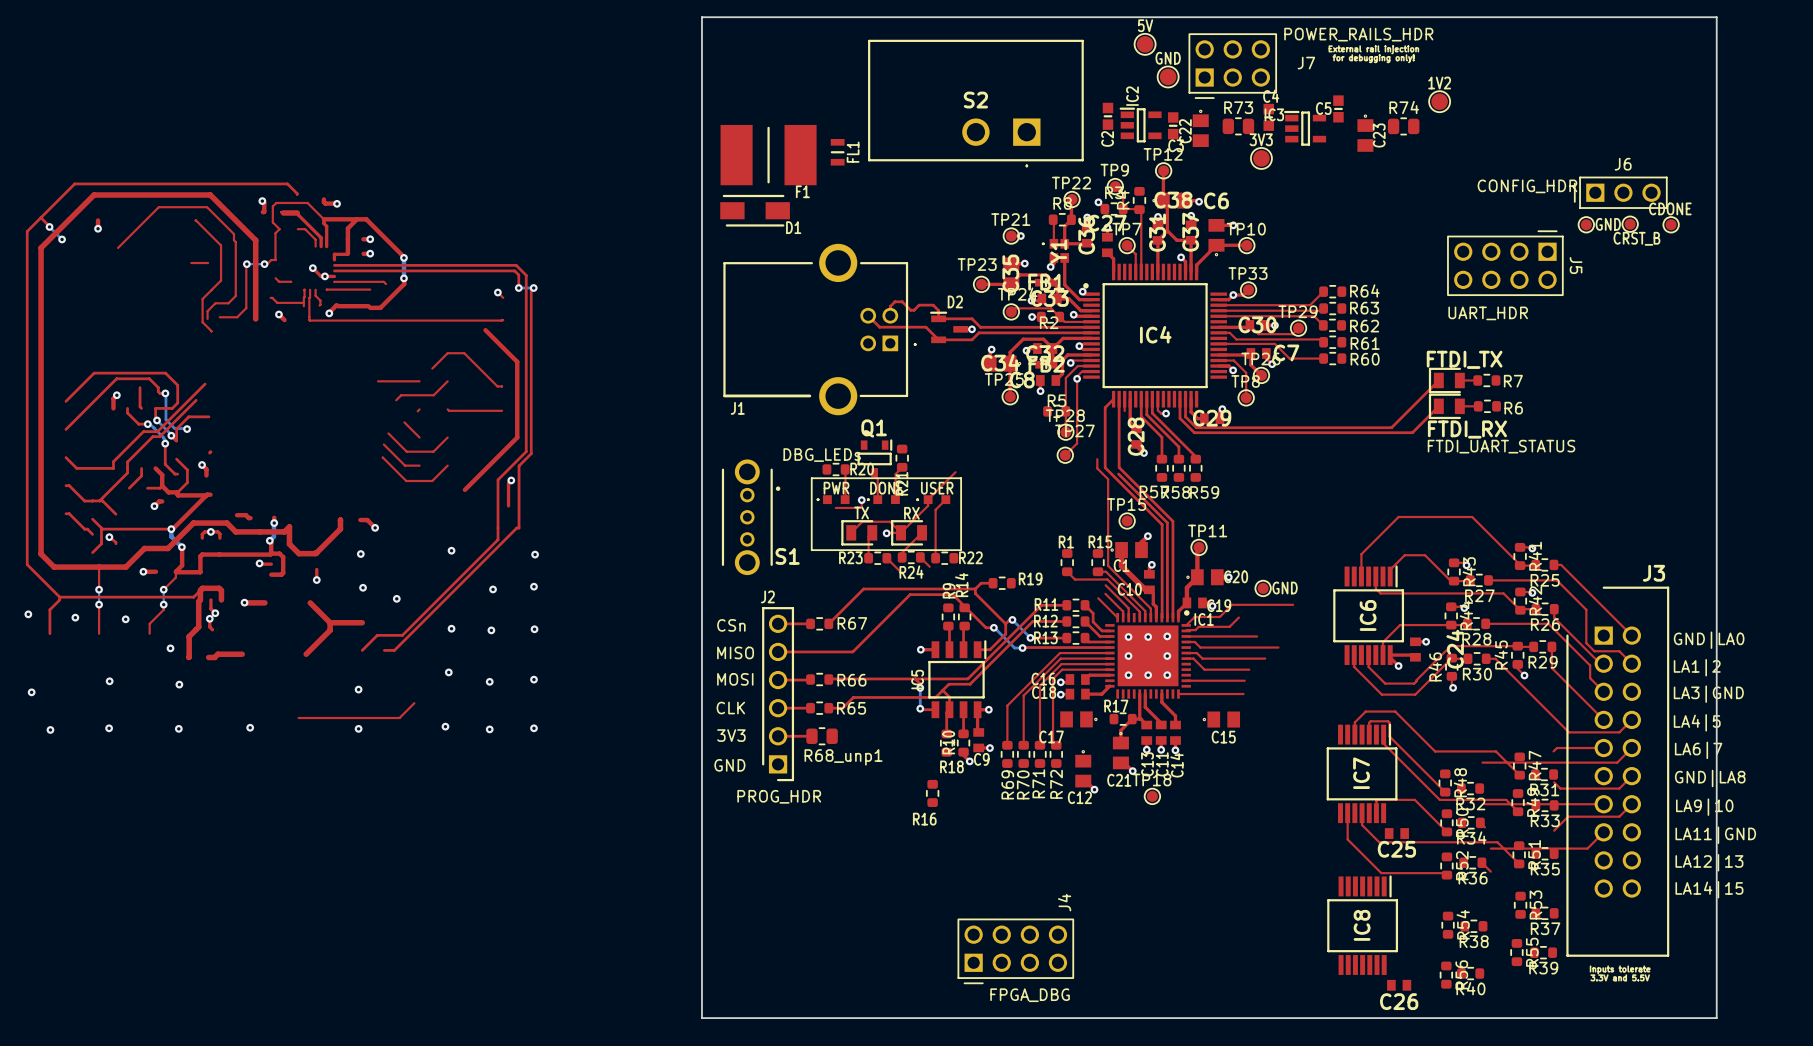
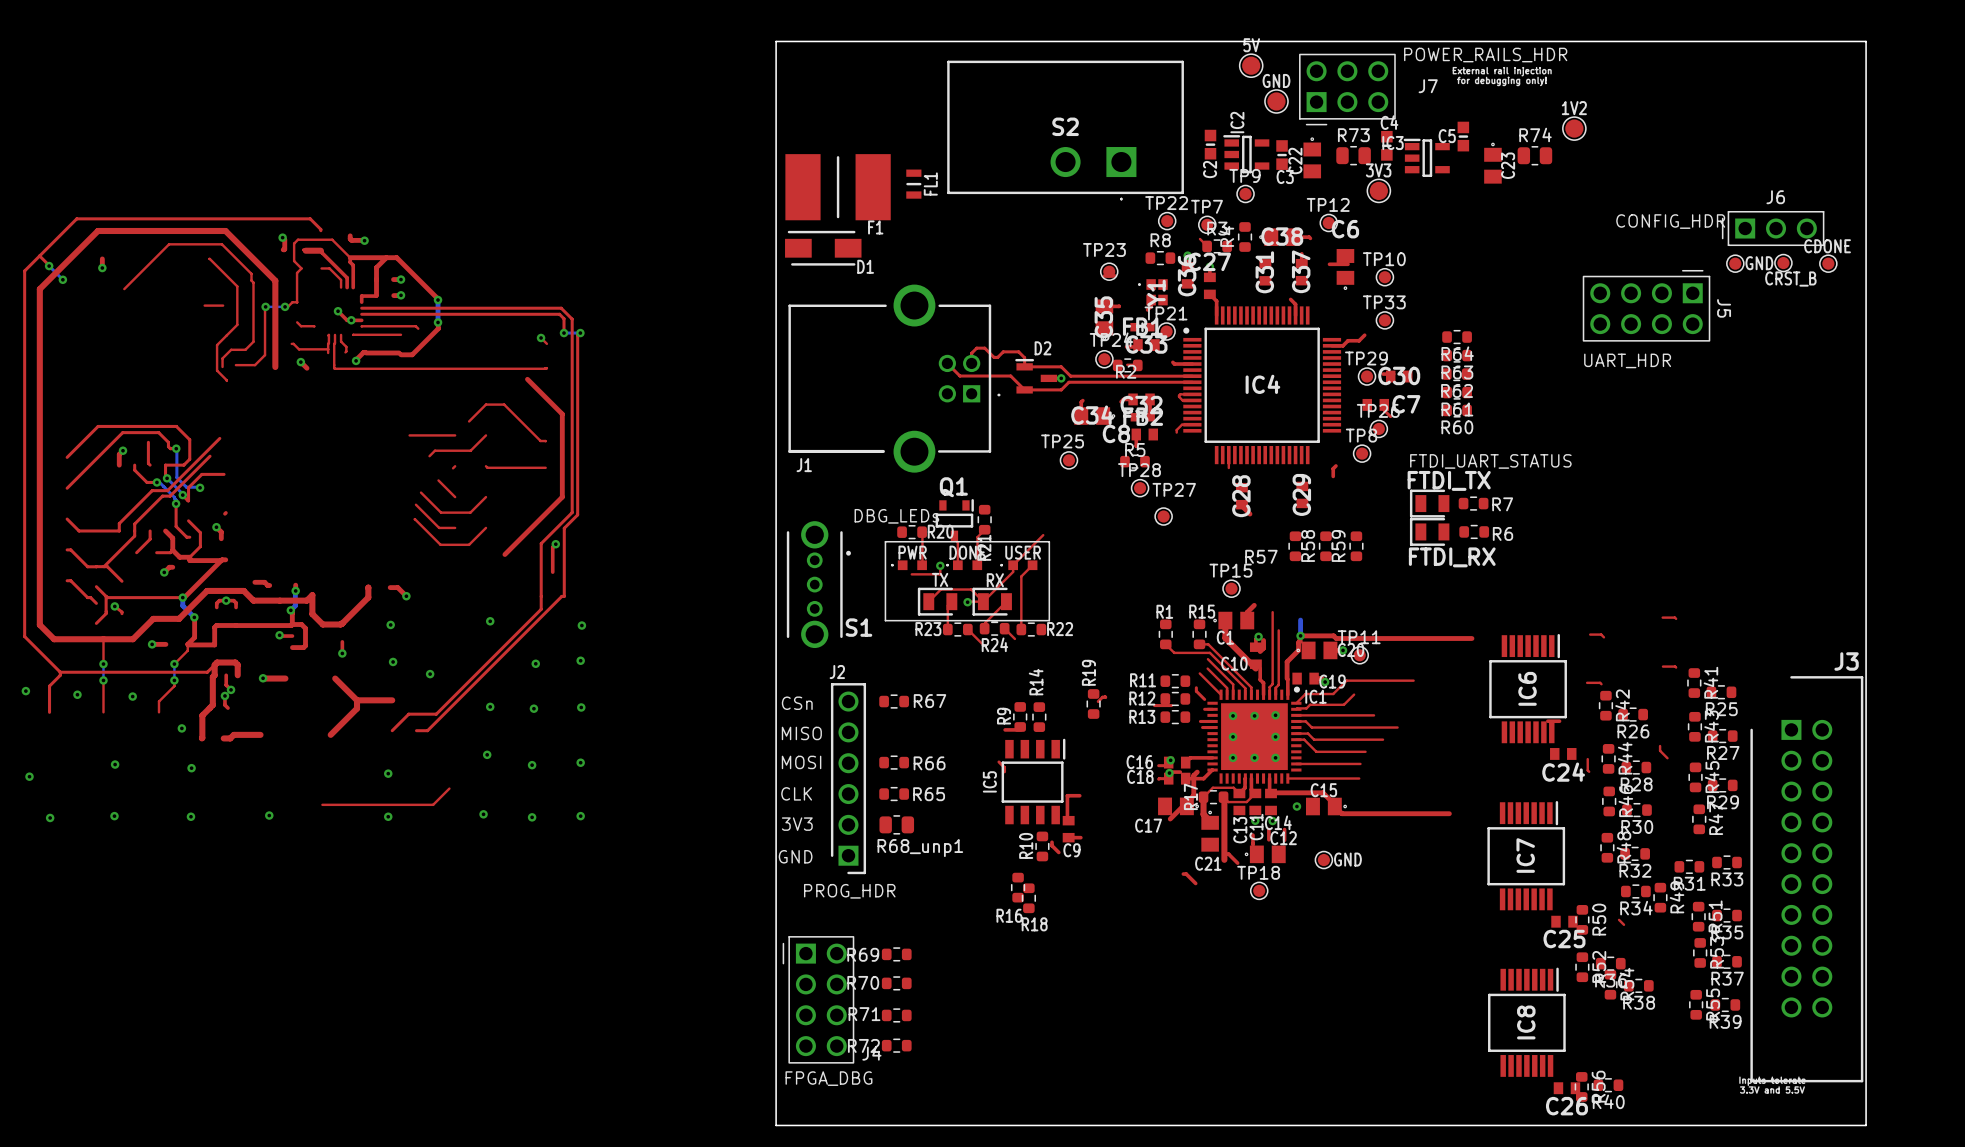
board edge: (701, 17) (1716, 17) (1716, 1018) (701, 1018) (701, 17) -> (776, 41) (776, 1125) (1866, 1125) (1866, 41) (776, 41)
top track: (1163, 170) (1163, 200) (1167, 204) (1167, 231) -> none
TP12 position: (1163, 170) -> (1328, 222)
top track: (1115, 186) (1123, 194) (1123, 209) (1138, 209) (1141, 211) (1141, 272) -> none
TP9 position: (1115, 186) -> (1245, 193)
top track: (1072, 199) (1071, 219) (1064, 226) (1064, 243) (1087, 243) -> none
TP22 position: (1072, 199) -> (1167, 221)
via: (1199, 201) -> none
via: (1098, 202) -> none
via: (1191, 215) -> none
via: (1158, 216) -> none
top track: (1053, 219) (1053, 243) -> none
via: (1233, 225) -> none
top track: (1167, 231) (1157, 240) (1157, 272) -> none
top track: (1167, 231) (1176, 240) (1191, 240) -> none
TP21 position: (1011, 236) -> (1166, 331)
via: (1020, 236) -> none
C6 position: (1216, 237) -> (1345, 269)
top track: (1191, 240) (1191, 272) -> none
top track: (1127, 245) (1135, 254) (1135, 272) -> none
TP7 position: (1127, 245) -> (1207, 224)
top track: (1246, 245) (1216, 245) (1196, 265) (1196, 272) -> none
TP10 position: (1246, 245) -> (1384, 277)
top track: (1064, 257) (1064, 284) (1079, 299) (1091, 299) -> none
via: (1181, 257) -> none
via: (1024, 263) -> none
via: (1050, 266) -> none
top track: (981, 284) (1010, 284) (1020, 274) (1045, 274) (1057, 286) (1057, 298) (1069, 298) (1080, 310) (1091, 310) -> none
TP23 position: (981, 284) -> (1109, 271)
TP33 position: (1248, 289) -> (1384, 320)
R64 name position: R64 (1364, 290) -> R64 (1457, 353)
via: (1082, 291) -> none
top track: (1323, 291) (1310, 305) (1218, 305) -> none
via: (1233, 295) -> none
via: (1031, 300) -> none
top track: (1323, 308) (1321, 310) (1218, 310) -> none
R63 name position: R63 (1364, 308) -> R63 (1457, 372)
top track: (1011, 311) (1014, 308) (1051, 308) (1064, 321) (1091, 321) -> none
via: (1073, 314) -> none
via: (1032, 316) -> none
R2 position: (1050, 316) -> (1127, 365)
top track: (1218, 316) (1314, 316) (1323, 325) -> none
C30 position: (1257, 325) -> (1399, 376)
via: (1274, 325) -> none
R62 name position: R62 (1364, 326) -> R62 (1457, 390)
top track: (1218, 327) (1247, 327) (1249, 325) (1258, 334) (1292, 334) (1298, 328) -> none
TP29 position: (1298, 328) -> (1367, 376)
top track: (1218, 332) (1229, 332) (1236, 339) (1320, 339) (1323, 342) -> none
top track: (1091, 338) (1063, 338) (1052, 348) (1043, 339) (1023, 339) (1010, 352) (1010, 396) -> none
top track: (1218, 343) (1274, 343) (1289, 358) (1323, 358) -> none
R61 name position: R61 (1365, 343) -> R61 (1457, 409)
via: (1079, 346) -> none
via: (991, 349) -> none
via: (1026, 350) -> none
top track: (1091, 354) (1067, 354) (1062, 360) (1062, 373) (1055, 380) -> none
top track: (1218, 354) (1250, 353) (1250, 364) (1261, 375) -> none
R60 name position: R60 (1365, 359) -> R60 (1457, 427)
top track: (1091, 360) (1073, 360) (1070, 362) -> none
top track: (1218, 360) (1233, 360) (1246, 372) (1246, 397) -> none
via: (1070, 362) -> none
via: (1272, 364) -> none
top track: (1091, 366) (1077, 366) (1065, 378) (1065, 432) -> none
top track: (1218, 366) (1228, 366) (1233, 370) -> none
via: (1233, 370) -> none
top track: (1077, 378) (1077, 443) (1065, 455) -> none
via: (1077, 378) -> none
top track: (1438, 380) (1391, 427) (1196, 427) (1185, 416) (1185, 399) -> none
part position: (1446, 380) -> (1429, 503)
top track: (1459, 380) (1477, 380) -> none
R7 position: (1486, 380) -> (1473, 503)
via: (1040, 391) -> none
TP25 position: (1010, 396) -> (1068, 460)
top track: (1113, 399) (1105, 407) (1105, 467) (1162, 524) (1161, 617) -> (1272, 612) (1272, 684) (1269, 687) (1269, 694)
top track: (1119, 399) (1119, 467) (1172, 521) (1172, 617) -> none
top track: (1130, 399) (1130, 422) (1136, 428) -> none
top track: (1141, 399) (1141, 416) (1161, 437) (1161, 459) -> none
top track: (1146, 399) (1146, 414) (1178, 446) (1178, 459) -> none
top track: (1152, 399) (1152, 413) (1195, 456) (1195, 459) -> none
top track: (1157, 399) (1157, 410) (1161, 413) (1166, 413) -> none
top track: (1180, 399) (1180, 418) (1194, 432) (1412, 432) (1438, 406) -> none
top track: (1191, 399) (1191, 411) (1197, 418) (1204, 418) -> none
part position: (1446, 406) -> (1429, 531)
top track: (1459, 406) (1478, 406) -> none
R6 position: (1487, 406) -> (1474, 531)
via: (1222, 409) -> none
R5 position: (1056, 411) -> (1134, 461)
via: (1166, 413) -> none
C29 rotation: 0° (1212, 418) -> 90° clockwise (1302, 494)
C29 position: (1212, 418) -> (1302, 494)
TP28 position: (1065, 432) -> (1140, 488)
text position: FTDI_UART_STATUS (1501, 446) -> FTDI_UART_STATUS (1490, 461)
via: (1143, 452) -> none
top track: (1097, 459) (1097, 468) (1108, 479) (1108, 565) (1150, 608) (1150, 617) -> none
R57 position: (1161, 468) -> (1295, 546)
R58 position: (1178, 468) -> (1325, 546)
R59 position: (1195, 468) -> (1356, 546)
top track: (1118, 474) (1167, 522) (1167, 611) -> (1278, 630) (1278, 684) (1275, 687)
R58 name rotation: 0° (1175, 492) -> 90° counterclockwise (1308, 545)
R59 name rotation: 0° (1204, 492) -> 90° counterclockwise (1338, 545)
TP11 name position: TP11 (1207, 530) -> TP11 (1359, 637)
via position: (1147, 536) -> (1300, 635)
top track: (1199, 547) (1197, 549) (1197, 577) (1186, 587) (1186, 602) (1178, 611) -> (1471, 638) (1336, 638) (1333, 635) (1300, 635) (1298, 650) (1287, 661) (1287, 687)
TP11 position: (1199, 547) -> (1359, 655)
via: (1532, 548) -> none
bottom track: none -> (1300, 620) (1300, 635)
R41 position: (1520, 556) -> (1694, 683)
top track: (1535, 564) (1520, 565) (1472, 517) (1398, 517) (1361, 554) (1361, 576) -> none
R25 position: (1544, 564) -> (1721, 692)
top track: (1553, 564) (1561, 564) (1631, 635) -> none
via: (1466, 565) -> none
top track: none -> (1263, 640) (1263, 648) (1260, 651)
R43 position: (1454, 571) -> (1694, 726)
top track: (1375, 576) (1375, 588) (1380, 593) (1503, 593) (1520, 610) (1536, 609) -> none
top track: (1390, 576) (1390, 569) (1404, 555) (1425, 555) (1450, 581) (1470, 580) -> none
R19 name position: R19 (1030, 578) -> R19 (1088, 672)
R27 position: (1479, 580) -> (1722, 736)
top track: (1488, 580) (1556, 580) (1586, 609) (1586, 643) (1594, 651) (1619, 651) (1631, 663) -> none
top track: (993, 583) (981, 583) (975, 589) -> none
R19 rotation: 0° (1002, 583) -> 90° clockwise (1093, 704)
R19 position: (1002, 583) -> (1093, 704)
part position: (1263, 588) -> (1323, 860)
top track: (975, 589) (975, 593) (1005, 623) (1005, 634) (990, 649) (977, 649) -> none
top track: (975, 589) (863, 589) (828, 623) -> none
R9 name position: R9 (949, 590) -> R9 (1004, 716)
via: (1532, 592) -> none
R42 position: (1520, 601) -> (1605, 705)
top track: (1066, 605) (1041, 605) (967, 678) (828, 679) -> none
top track: (1085, 605) (1093, 613) (1093, 621) (1102, 630) -> none
via: (1464, 608) -> none
R26 position: (1545, 609) -> (1633, 714)
top track: (1554, 609) (1554, 617) (1600, 663) (1603, 663) -> none
top track: none -> (1196, 687) (1196, 691) (1204, 699)
IC6 position: (1368, 615) -> (1528, 688)
R44 position: (1451, 615) -> (1608, 758)
R9 position: (948, 616) -> (1020, 716)
R14 position: (964, 616) -> (1039, 717)
bottom track: (1012, 619) (1030, 637) -> none
via: (1012, 619) -> none
top track: (1066, 621) (1032, 621) (970, 684) (948, 684) (935, 697) (853, 697) (842, 708) (828, 708) -> none
top track: (1085, 621) (1100, 636) (1109, 636) -> none
top track: (778, 623) (810, 623) -> none
top track: (1467, 623) (1400, 625) (1383, 642) (1383, 655) -> none
R28 position: (1476, 623) -> (1636, 767)
top track: (1485, 623) (1548, 623) (1590, 665) (1590, 678) (1603, 691) -> none
top track: (948, 626) (949, 649) -> none
top track: (964, 626) (963, 649) -> none
top track: (993, 627) (986, 627) (952, 594) (910, 594) (852, 651) (778, 651) -> none
bottom track: (993, 627) (1014, 648) (1022, 648) -> none
via: (993, 627) -> none
top track: none -> (1154, 705) (1171, 705)
top track: (1030, 637) (1066, 638) -> none
via: (1030, 637) -> none
top track: (1085, 638) (1089, 642) (1098, 642) -> none
text: GND|LA0 (1709, 640) -> none
via: (1426, 641) -> none
top track: (1533, 646) (1450, 646) (1414, 683) (1385, 683) (1368, 667) (1368, 655) -> none
R29 position: (1542, 646) -> (1722, 785)
top track: (1551, 646) (1551, 668) (1603, 719) -> none
top track: (1100, 647) (1022, 648) -> none
via: (1022, 648) -> none
via: (920, 649) -> none
C24 rotation: 0° (1415, 649) -> 90° clockwise (1563, 753)
C24 position: (1415, 649) -> (1563, 753)
C24 name position: C24 (1455, 649) -> C24 (1563, 772)
top track: (1109, 653) (1060, 653) (1007, 705) (1007, 745) -> none
top track: (1354, 655) (1354, 667) (1381, 694) (1415, 694) (1451, 658) (1467, 658) -> none
R45 name position: R45 (1501, 655) -> R45 (1712, 777)
R45 position: (1517, 655) -> (1695, 777)
top track: (1415, 657) (1413, 655) (1390, 655) (1390, 657) (1398, 666) -> none
top track: (1109, 658) (1060, 658) (1023, 695) (1023, 745) -> none
R30 position: (1477, 658) -> (1636, 810)
top track: (1486, 658) (1495, 658) (1568, 732) (1619, 732) (1631, 719) -> none
top track: (1109, 664) (1061, 664) (1039, 685) (1039, 745) -> none
via: (1398, 666) -> none
R46 name position: R46 (1435, 666) -> R46 (1625, 801)
R46 position: (1451, 667) -> (1609, 801)
text: LA1|2 (1697, 667) -> none
top track: (1109, 669) (1062, 669) (1053, 678) (1053, 742) (1056, 745) -> none
via: (1524, 675) -> none
via: none -> (1170, 760)
top track: (810, 679) (778, 680) -> none
IC5 position: (957, 679) -> (1033, 781)
via: (1060, 682) -> none
bottom track: (920, 687) (920, 708) -> none
via: (920, 687) -> none
via: (1453, 687) -> none
top track: none -> (1170, 772) (1180, 772)
top track: none -> (1197, 772) (1193, 775) (1193, 795) (1170, 819)
via: none -> (1169, 773)
top track: (942, 690) (949, 697) (949, 709) (946, 712) (946, 734) -> none
via: (1060, 694) -> none
top track: (1139, 694) (1139, 718) (1146, 725) -> (1245, 778) (1245, 787) (1239, 793) (1233, 787) (1212, 787) (1203, 797) (1203, 814) (1211, 822)
text: LA3|GND (1708, 694) -> none
top track: (1161, 702) (1175, 715) (1175, 725) -> (1269, 787) (1271, 793) (1322, 792) (1342, 813) (1449, 813)
top track: (1145, 704) (1145, 707) (1161, 724) -> (1251, 789) (1255, 793) (1246, 802) (1228, 802) (1223, 797)
R17 name rotation: 0° (1116, 706) -> 90° counterclockwise (1190, 796)
top track: (778, 708) (810, 708) -> none
top track: (920, 708) (935, 709) -> none
via: (920, 708) -> none
top track: (963, 709) (963, 733) -> none
via: (988, 709) -> none
top track: none -> (1223, 797) (1224, 859)
R17 position: (1123, 719) -> (1213, 797)
top track: (1140, 719) (1132, 719) (1120, 730) (1120, 743) -> none
via: none -> (1296, 806)
C15 rotation: 0° (1221, 719) -> 180° (1326, 806)
text: LA4|5 (1697, 722) -> none
C13 position: (1146, 732) -> (1239, 802)
via: none -> (1255, 820)
C11 position: (1161, 732) -> (1255, 801)
via: none -> (1272, 821)
C14 position: (1175, 732) -> (1271, 802)
top track: (1354, 734) (1354, 722) (1365, 711) (1395, 711) (1435, 751) (1495, 751) (1519, 775) -> none
top track: (1369, 734) (1370, 721) (1388, 721) (1389, 736) (1445, 792) -> none
top track: (1383, 734) (1383, 743) (1439, 799) (1506, 799) (1518, 811) -> none
top track: (778, 736) (811, 736) -> none
R10 position: (963, 742) -> (1042, 846)
R18 position: (946, 743) -> (1028, 898)
via: (989, 748) -> none
top track: (1603, 748) (1556, 748) (1553, 751) -> none
top track: (1631, 748) (1617, 762) (1482, 762) -> none
via: (1146, 749) -> none
via: (1161, 749) -> none
C21 position: (1120, 750) -> (1210, 831)
via: (1175, 750) -> none
text: LA6|7 (1698, 750) -> none
R69 rotation: 0° (1007, 754) -> 90° clockwise (896, 954)
R69 position: (1007, 754) -> (896, 954)
R70 rotation: 0° (1023, 754) -> 90° clockwise (896, 983)
R70 position: (1023, 754) -> (896, 983)
R71 rotation: 0° (1039, 754) -> 90° clockwise (896, 1015)
R71 position: (1039, 754) -> (896, 1015)
R72 rotation: 0° (1056, 754) -> 90° clockwise (896, 1045)
R72 position: (1056, 754) -> (896, 1045)
via: (969, 761) -> none
C13 name position: C13 (1147, 764) -> C13 (1240, 830)
C11 name position: C11 (1162, 764) -> C11 (1256, 827)
C14 name rotation: 0° (1177, 765) -> 90° clockwise (1278, 822)
R47 position: (1519, 766) -> (1699, 819)
C12 rotation: 0° (1083, 768) -> 90° counterclockwise (1265, 854)
C12 position: (1083, 768) -> (1265, 854)
via: (1132, 771) -> none
J3 position: (1617, 771) -> (1806, 879)
IC7 position: (1362, 773) -> (1526, 855)
top track: (1631, 776) (1619, 788) (1560, 788) (1554, 782) -> none
text: GND|LA8 (1710, 778) -> none
R48 position: (1445, 783) -> (1607, 847)
R32 position: (1470, 788) -> (1635, 853)
via: (1094, 789) -> none
top track: (1484, 804) (1603, 804) -> none
top track: (1631, 804) (1619, 816) (1568, 816) (1554, 830) -> none
R33 position: (1545, 805) -> (1727, 862)
text: LA9|10 (1704, 807) -> none
top track: (1347, 813) (1347, 839) (1381, 873) (1444, 873) (1446, 875) -> none
top track: (1362, 813) (1362, 825) (1379, 842) (1497, 842) (1519, 863) -> none
top track: (1376, 813) (1377, 799) (1414, 799) (1446, 831) -> none
R34 position: (1471, 822) -> (1635, 891)
top track: (1603, 832) (1587, 848) (1490, 848) -> none
C25 position: (1396, 833) -> (1564, 921)
text: LA11|GND (1715, 835) -> none
R35 position: (1545, 853) -> (1727, 915)
R51 position: (1519, 854) -> (1698, 916)
top track: (1481, 862) (1490, 871) -> none
text: LA12|13 (1709, 862) -> none
text: LA14|15 (1709, 889) -> none
R53 position: (1520, 905) -> (1700, 952)
R37 position: (1545, 913) -> (1727, 961)
IC8 position: (1362, 925) -> (1526, 1022)
R54 position: (1448, 925) -> (1610, 984)
R38 position: (1473, 926) -> (1638, 985)
J4 rotation: 0° (1015, 951) -> 90° clockwise (818, 999)
J4 position: (1015, 951) -> (818, 999)
R55 position: (1516, 952) -> (1696, 1004)
R39 position: (1543, 952) -> (1725, 1004)
C26 position: (1399, 985) -> (1566, 1088)
text position: FPGA_DBG (1030, 995) -> FPGA_DBG (828, 1078)

